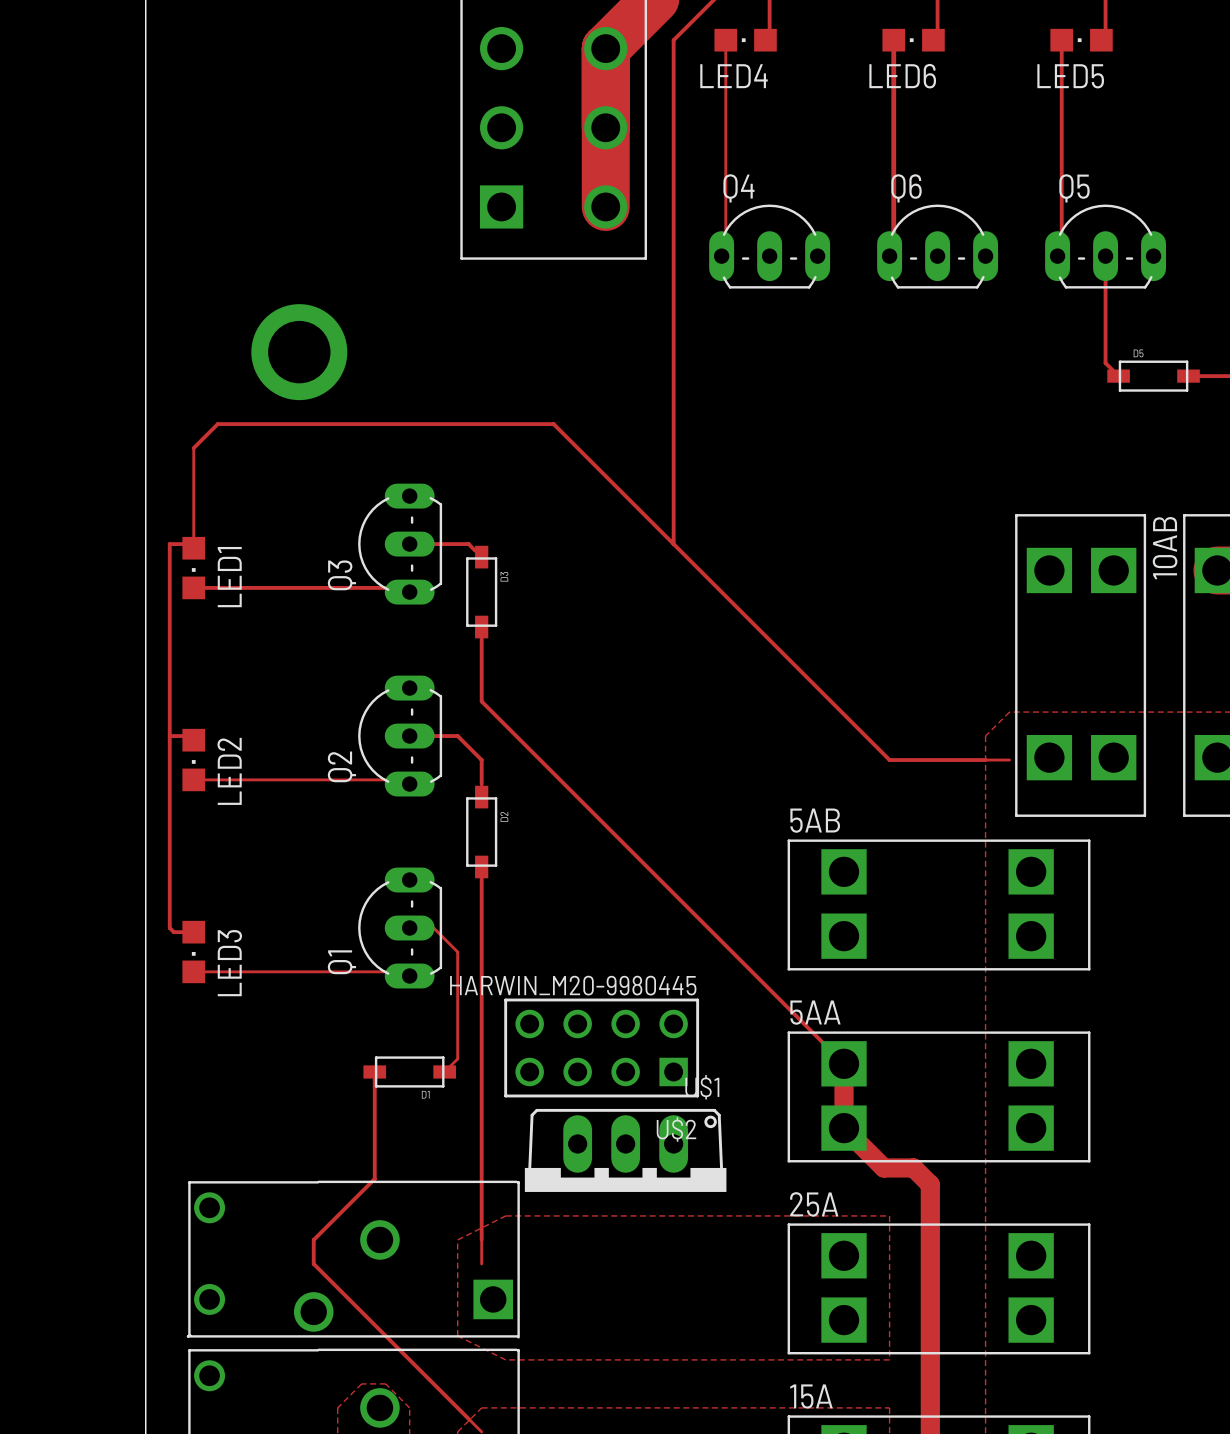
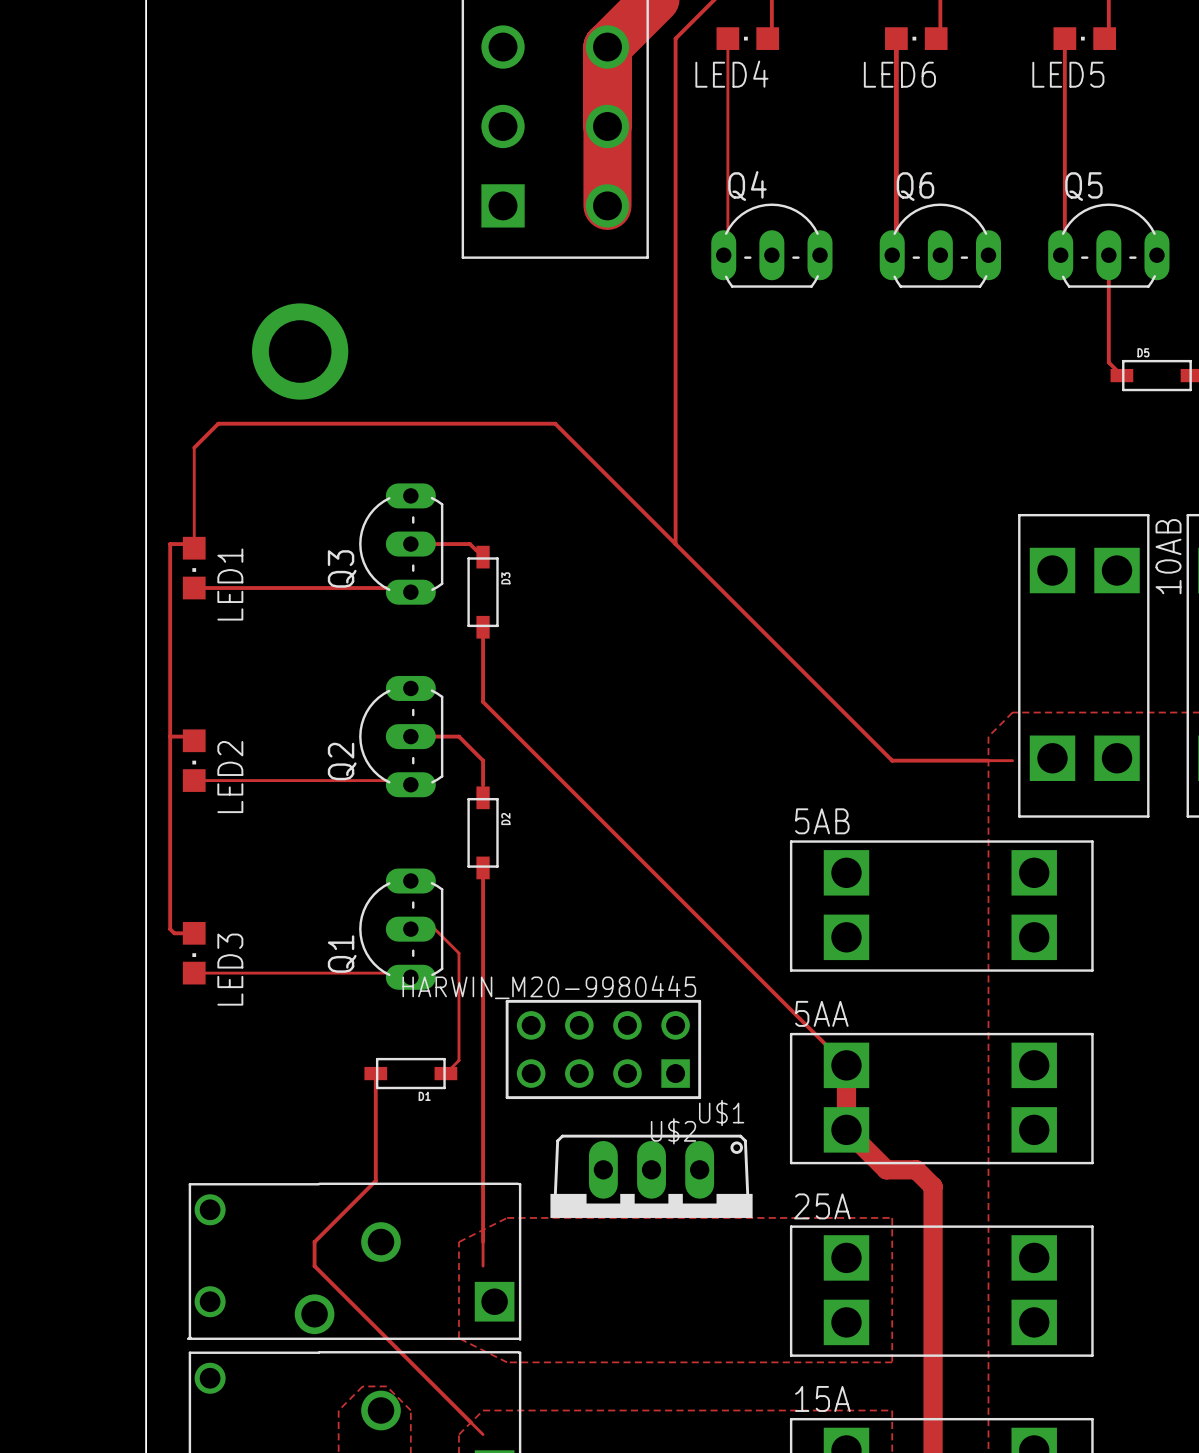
U$1 position: (625, 1150) -> (651, 1176)

